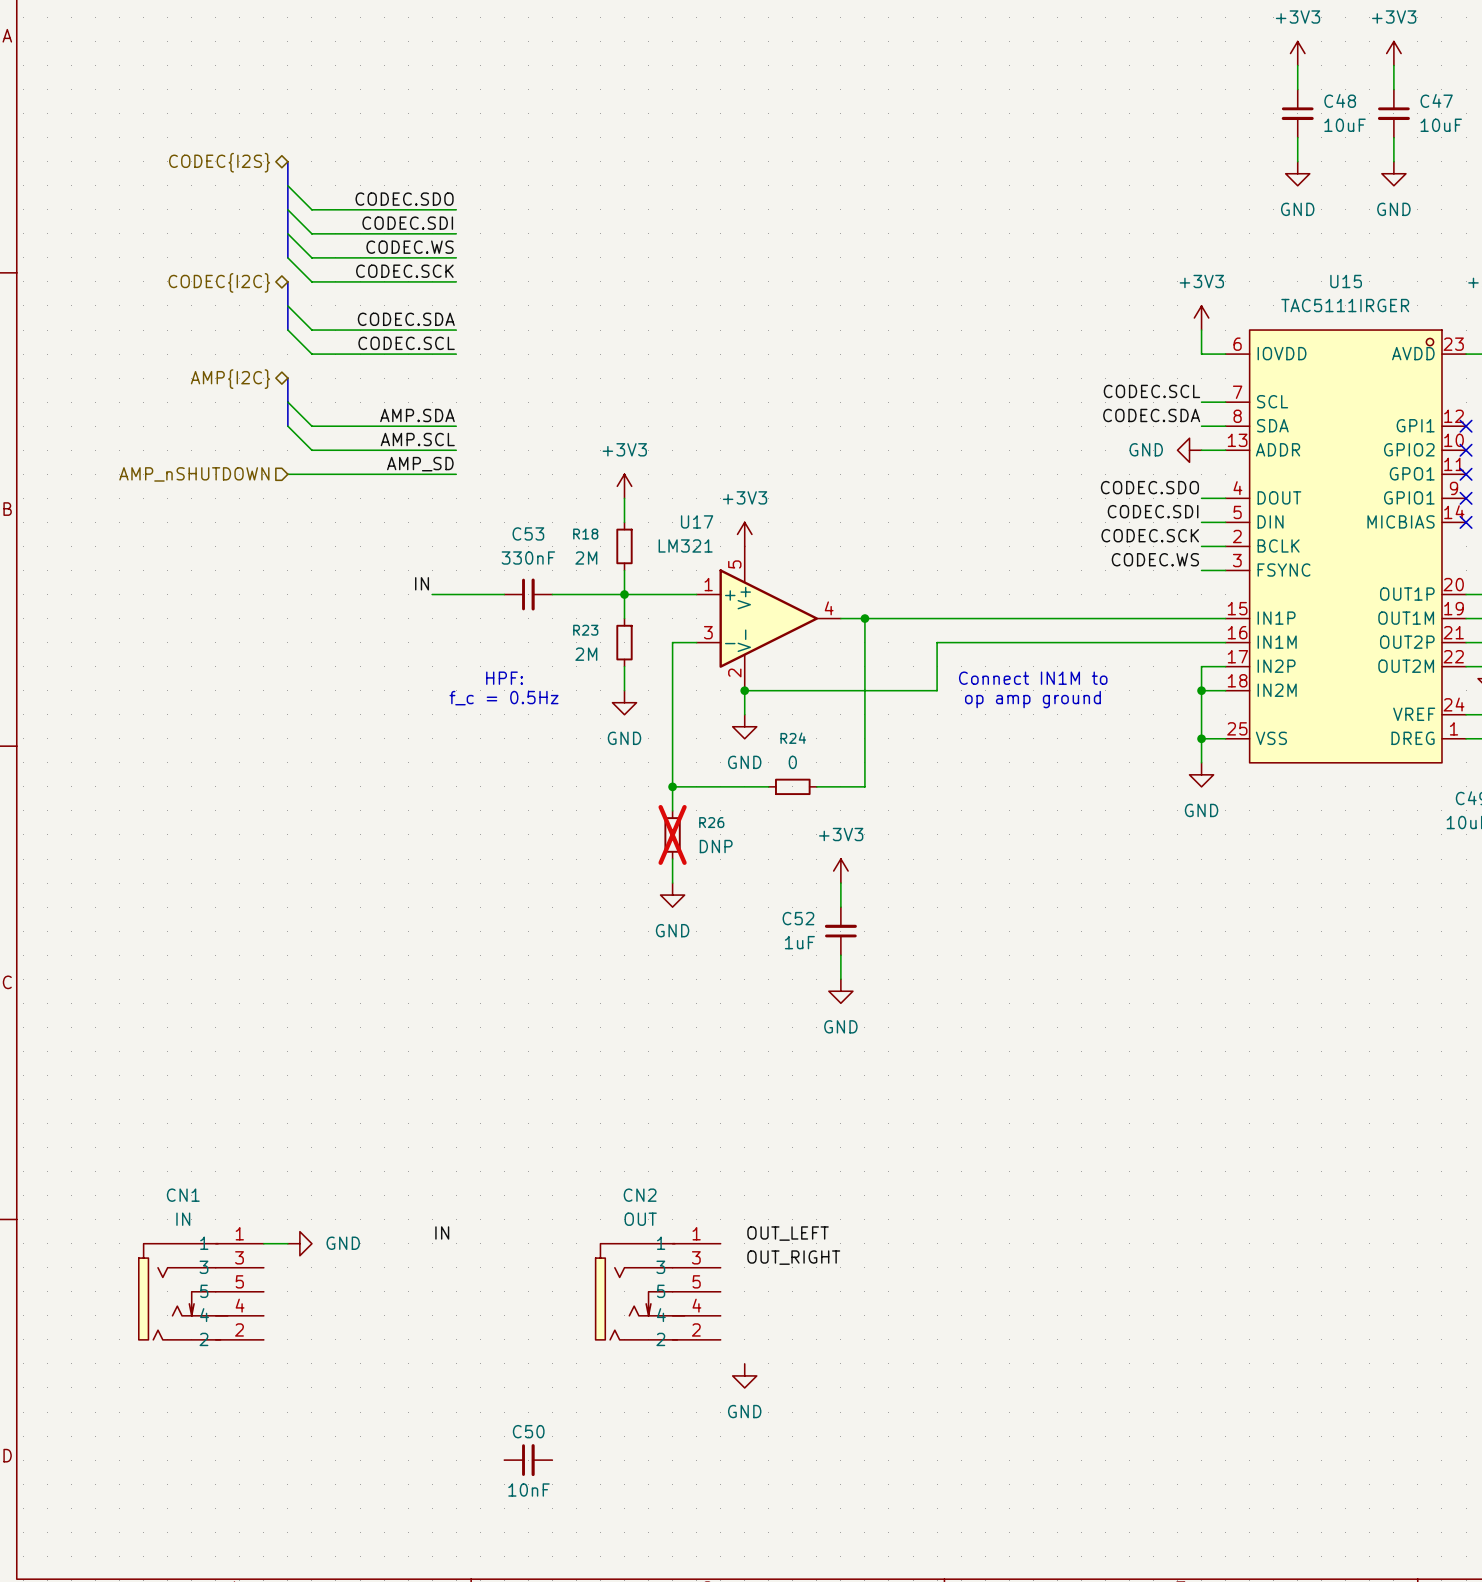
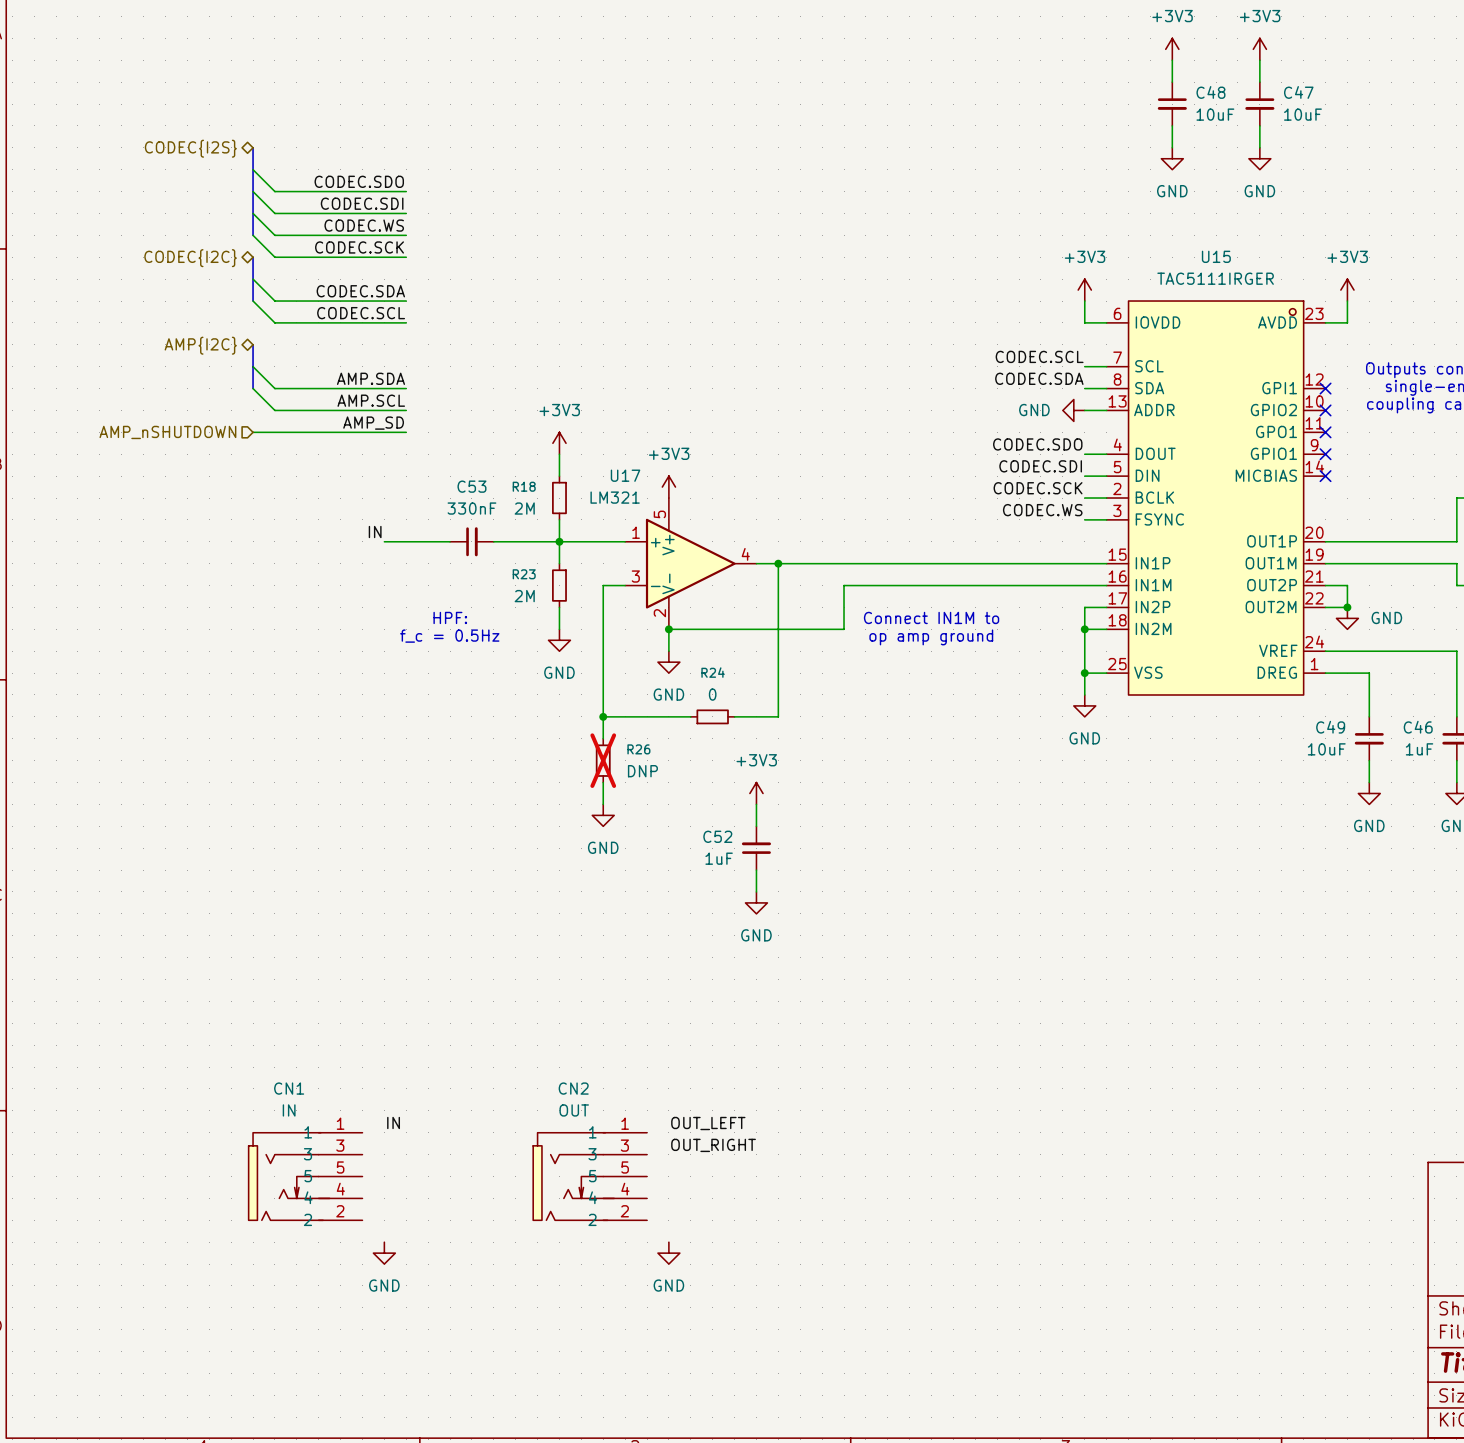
wire: (263, 1243) (287, 1243) -> none
power symbol rotation: 0° (299, 1243) -> 90° clockwise (384, 1253)
power symbol position: GND (299, 1243) -> GND (384, 1253)
CN1 position: (201, 1291) -> (305, 1176)
C50: 10nF (528, 1460) -> none

